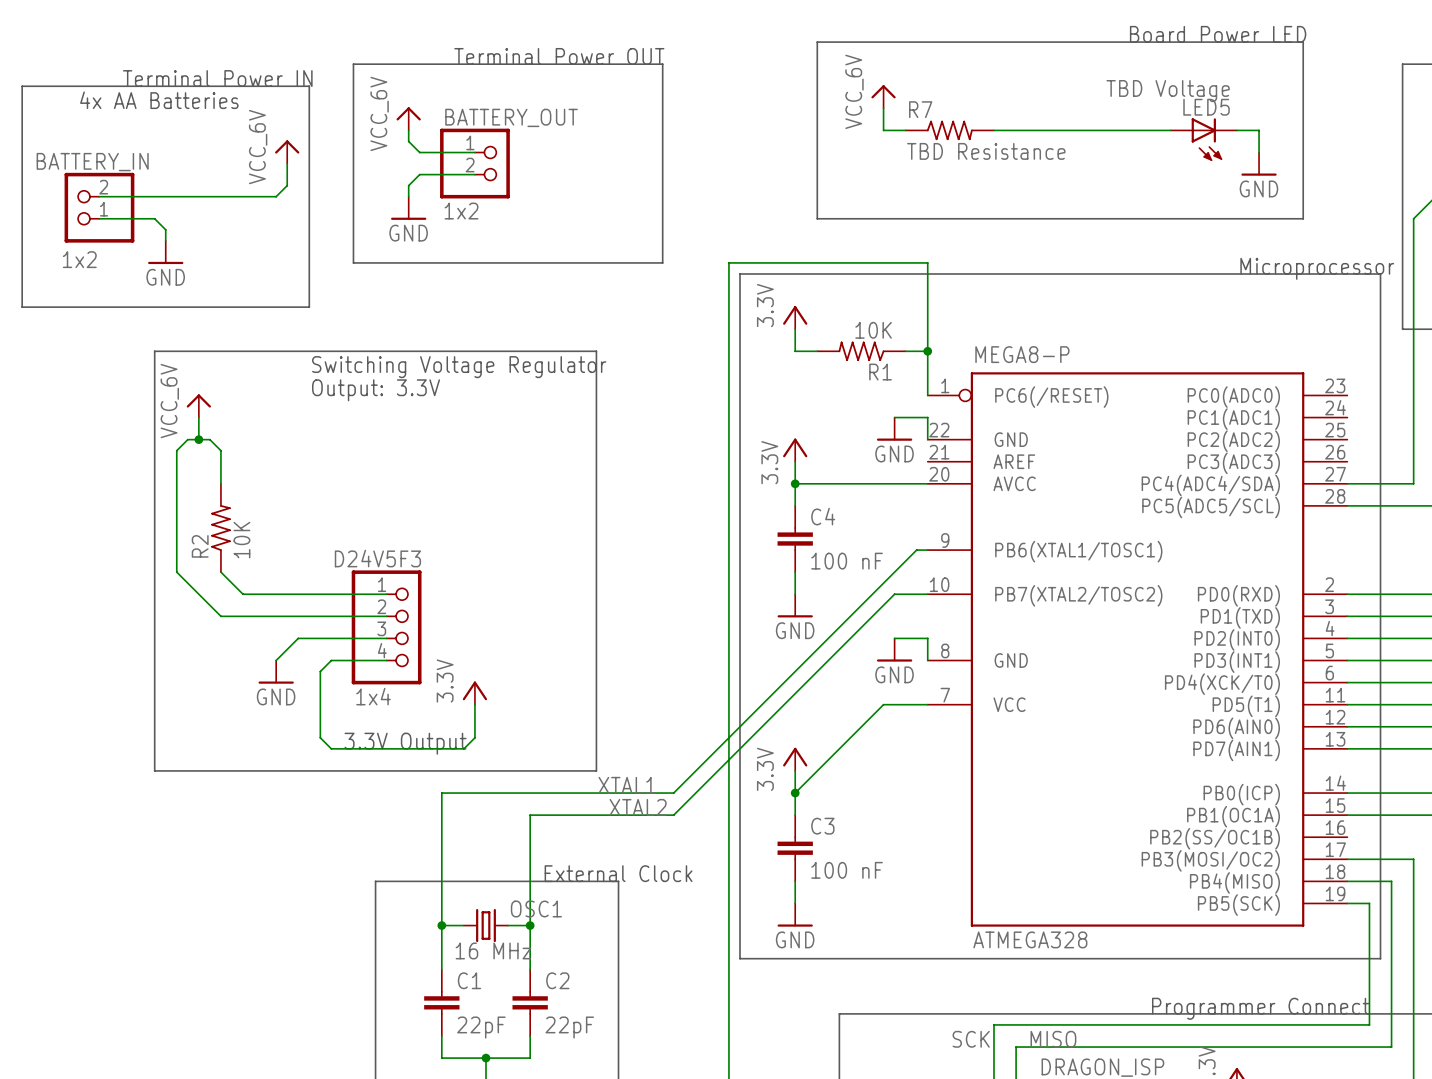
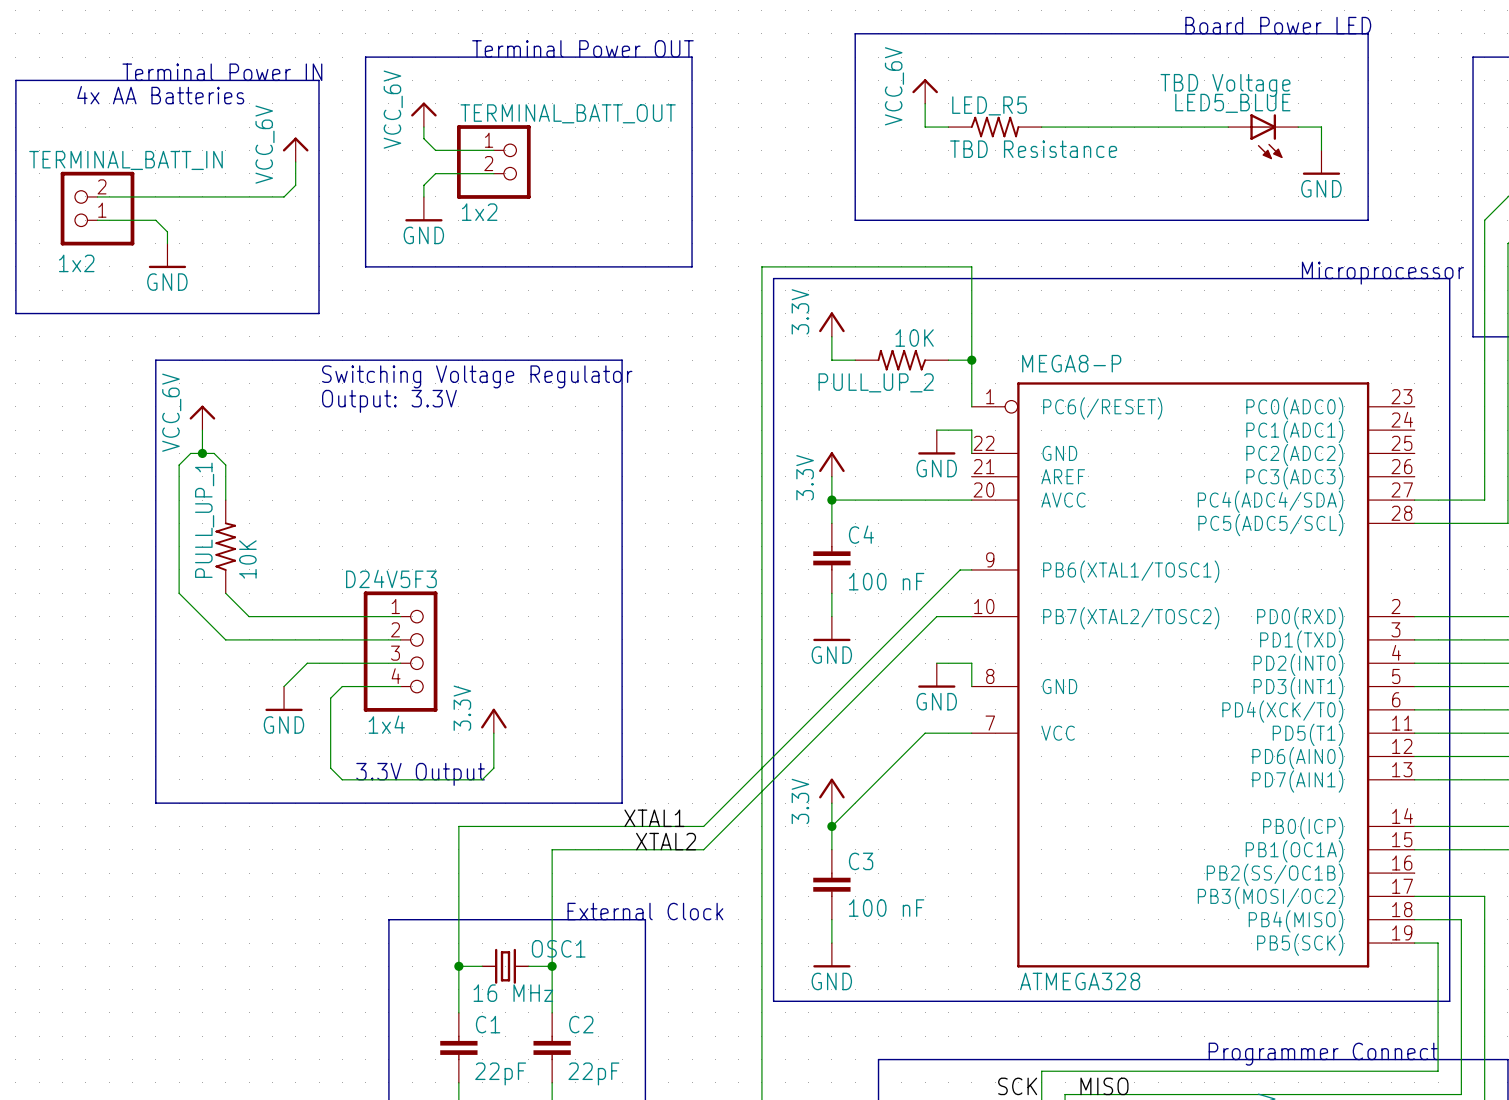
LED5 name: LED5 (1206, 107) -> LED5_BLUE (1232, 103)
R7 name: R7 (920, 109) -> LED_R5 (989, 105)
BATTERY_OUT name: BATTERY_OUT (511, 117) -> TERMINAL_BATT_OUT (568, 113)
BATTERY_IN name: BATTERY_IN (92, 162) -> TERMINAL_BATT_IN (126, 160)
R1 name: R1 (880, 372) -> PULL_UP_2 (876, 382)
R2 name: R2 (200, 546) -> PULL_UP_1 (204, 520)

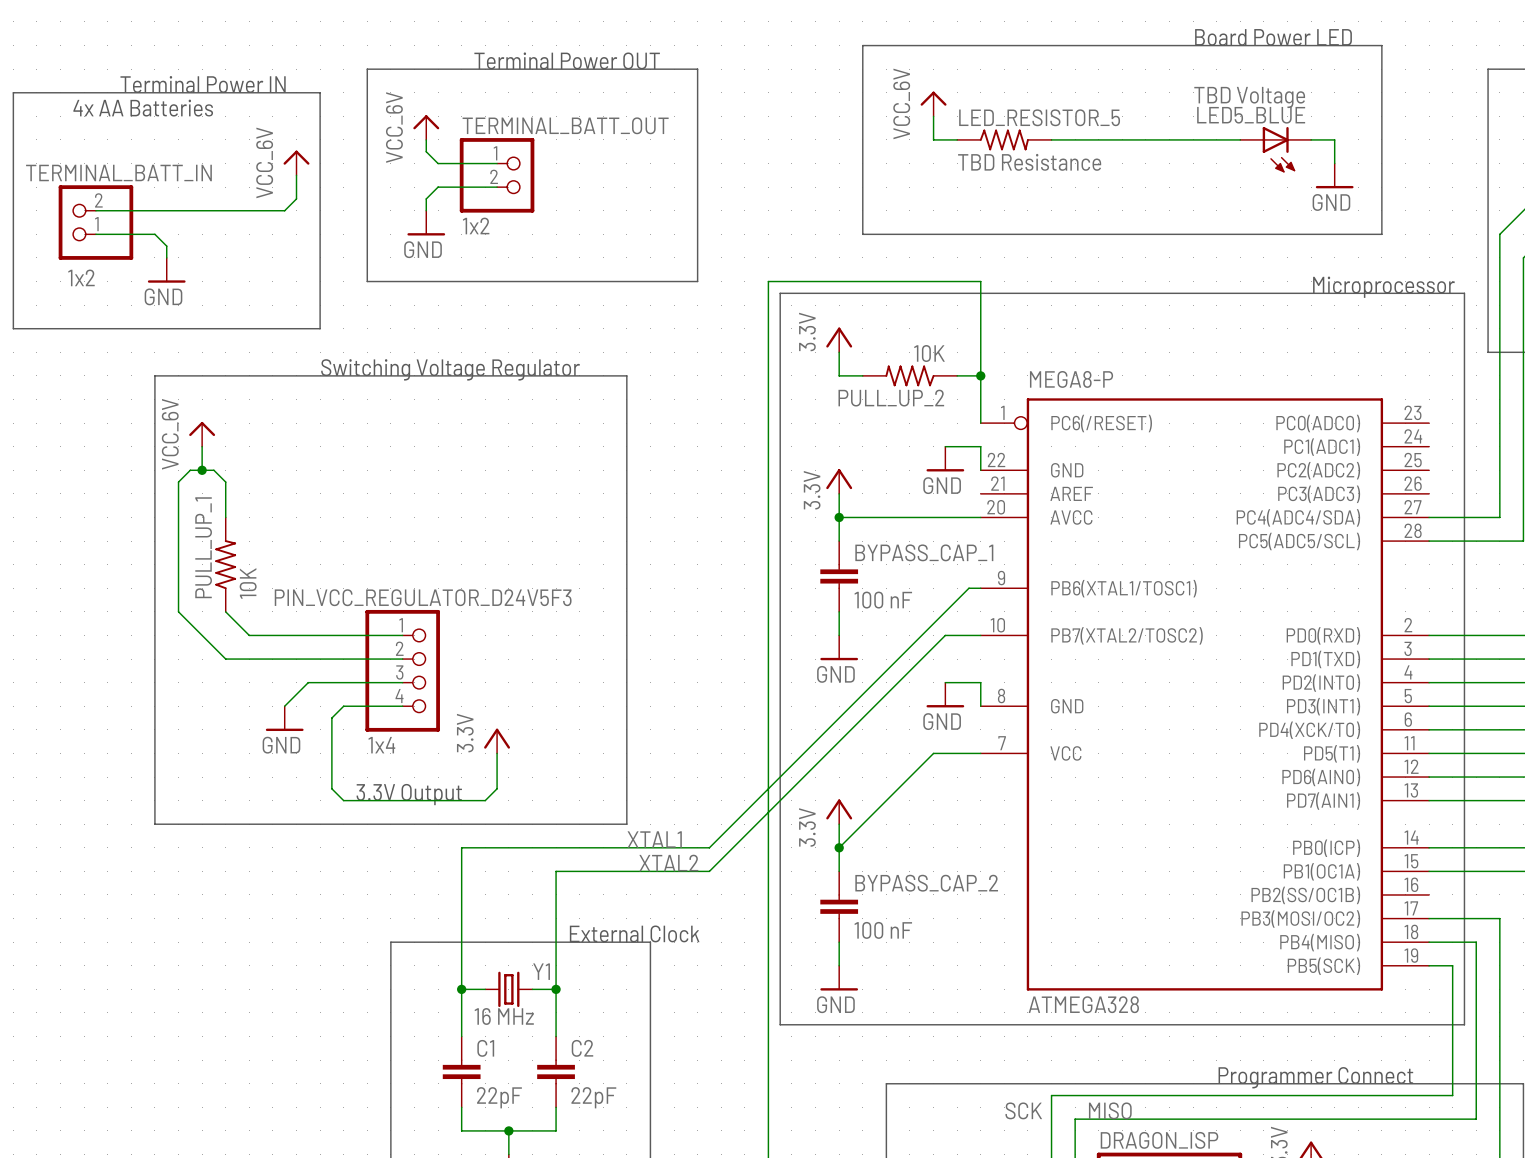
LED_R5 name: LED_R5 (989, 105) -> LED_RESISTOR_5 (1039, 117)
text position: Switching Voltage Regulator (477, 376) -> Switching Voltage Regulator (450, 369)
text: Output: 3.3V (389, 401) -> none
C4 name: C4 (861, 534) -> BYPASS_CAP_1 (924, 552)
D24V5F3 name: D24V5F3 (391, 578) -> PIN_VCC_REGULATOR_D24V5F3 (423, 597)
C3 name: C3 (861, 861) -> BYPASS_CAP_2 (926, 883)
OSC1 name: OSC1 (558, 948) -> Y1 (541, 971)

